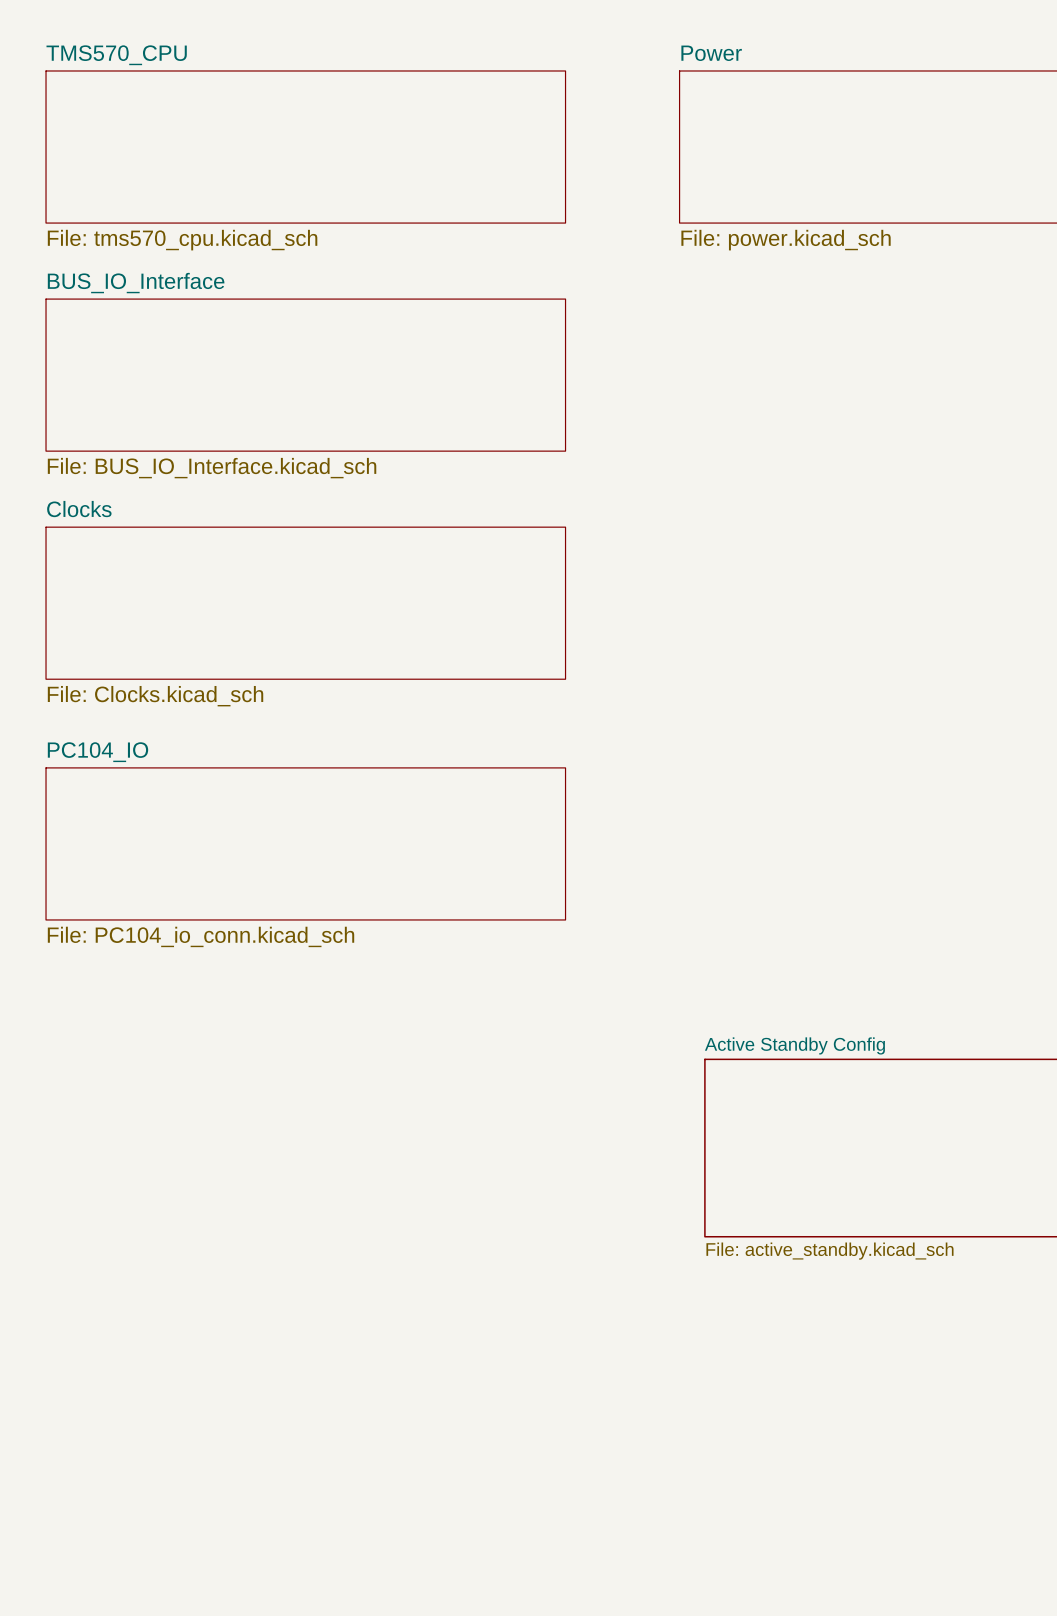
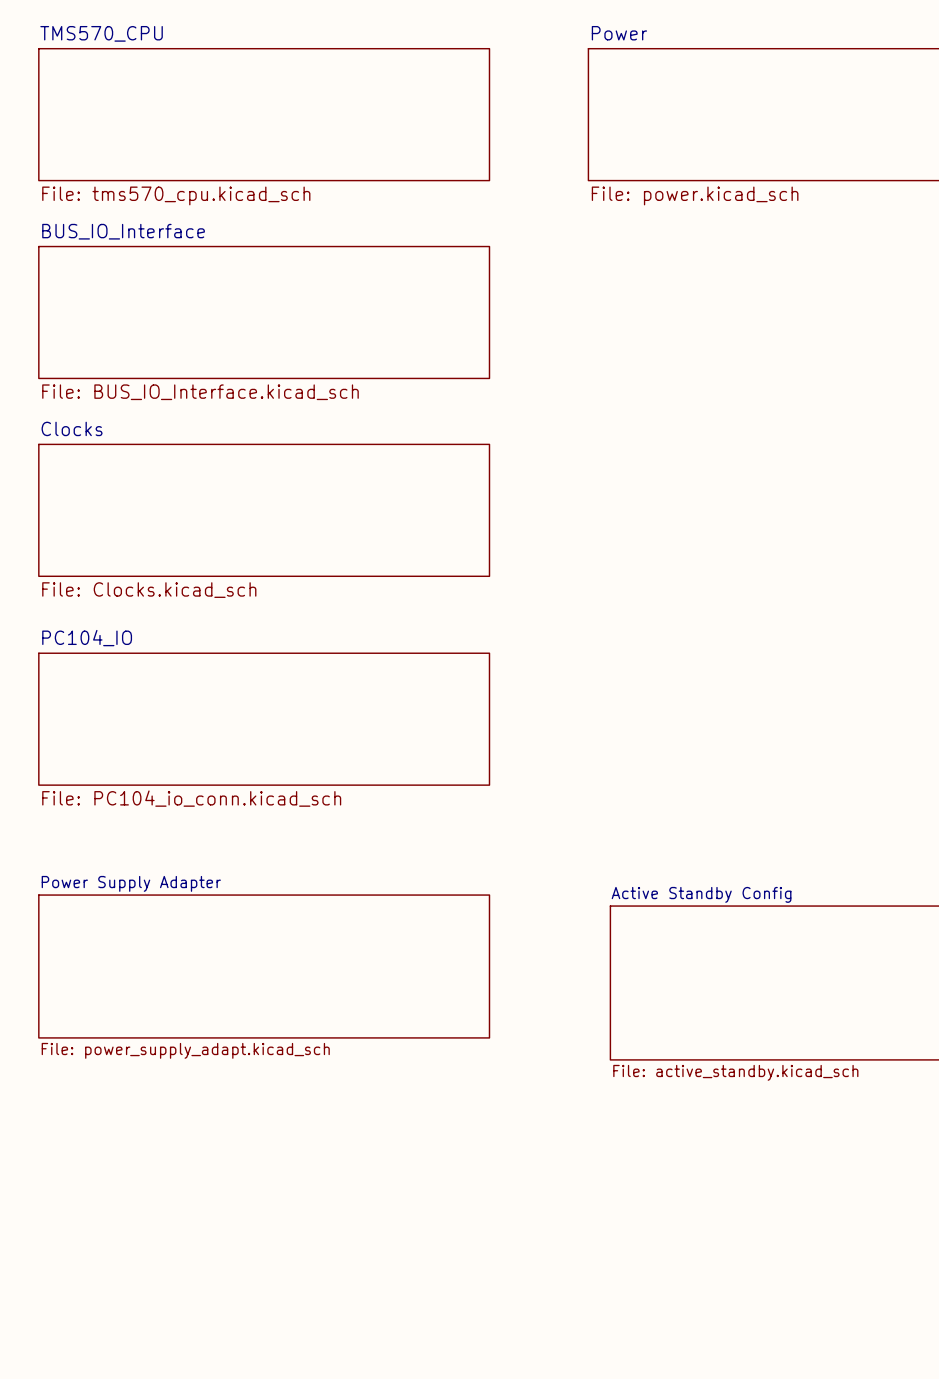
sheet Power Supply Adapter: none -> File: power_supply_adapt.kicad_sch (264, 966)

